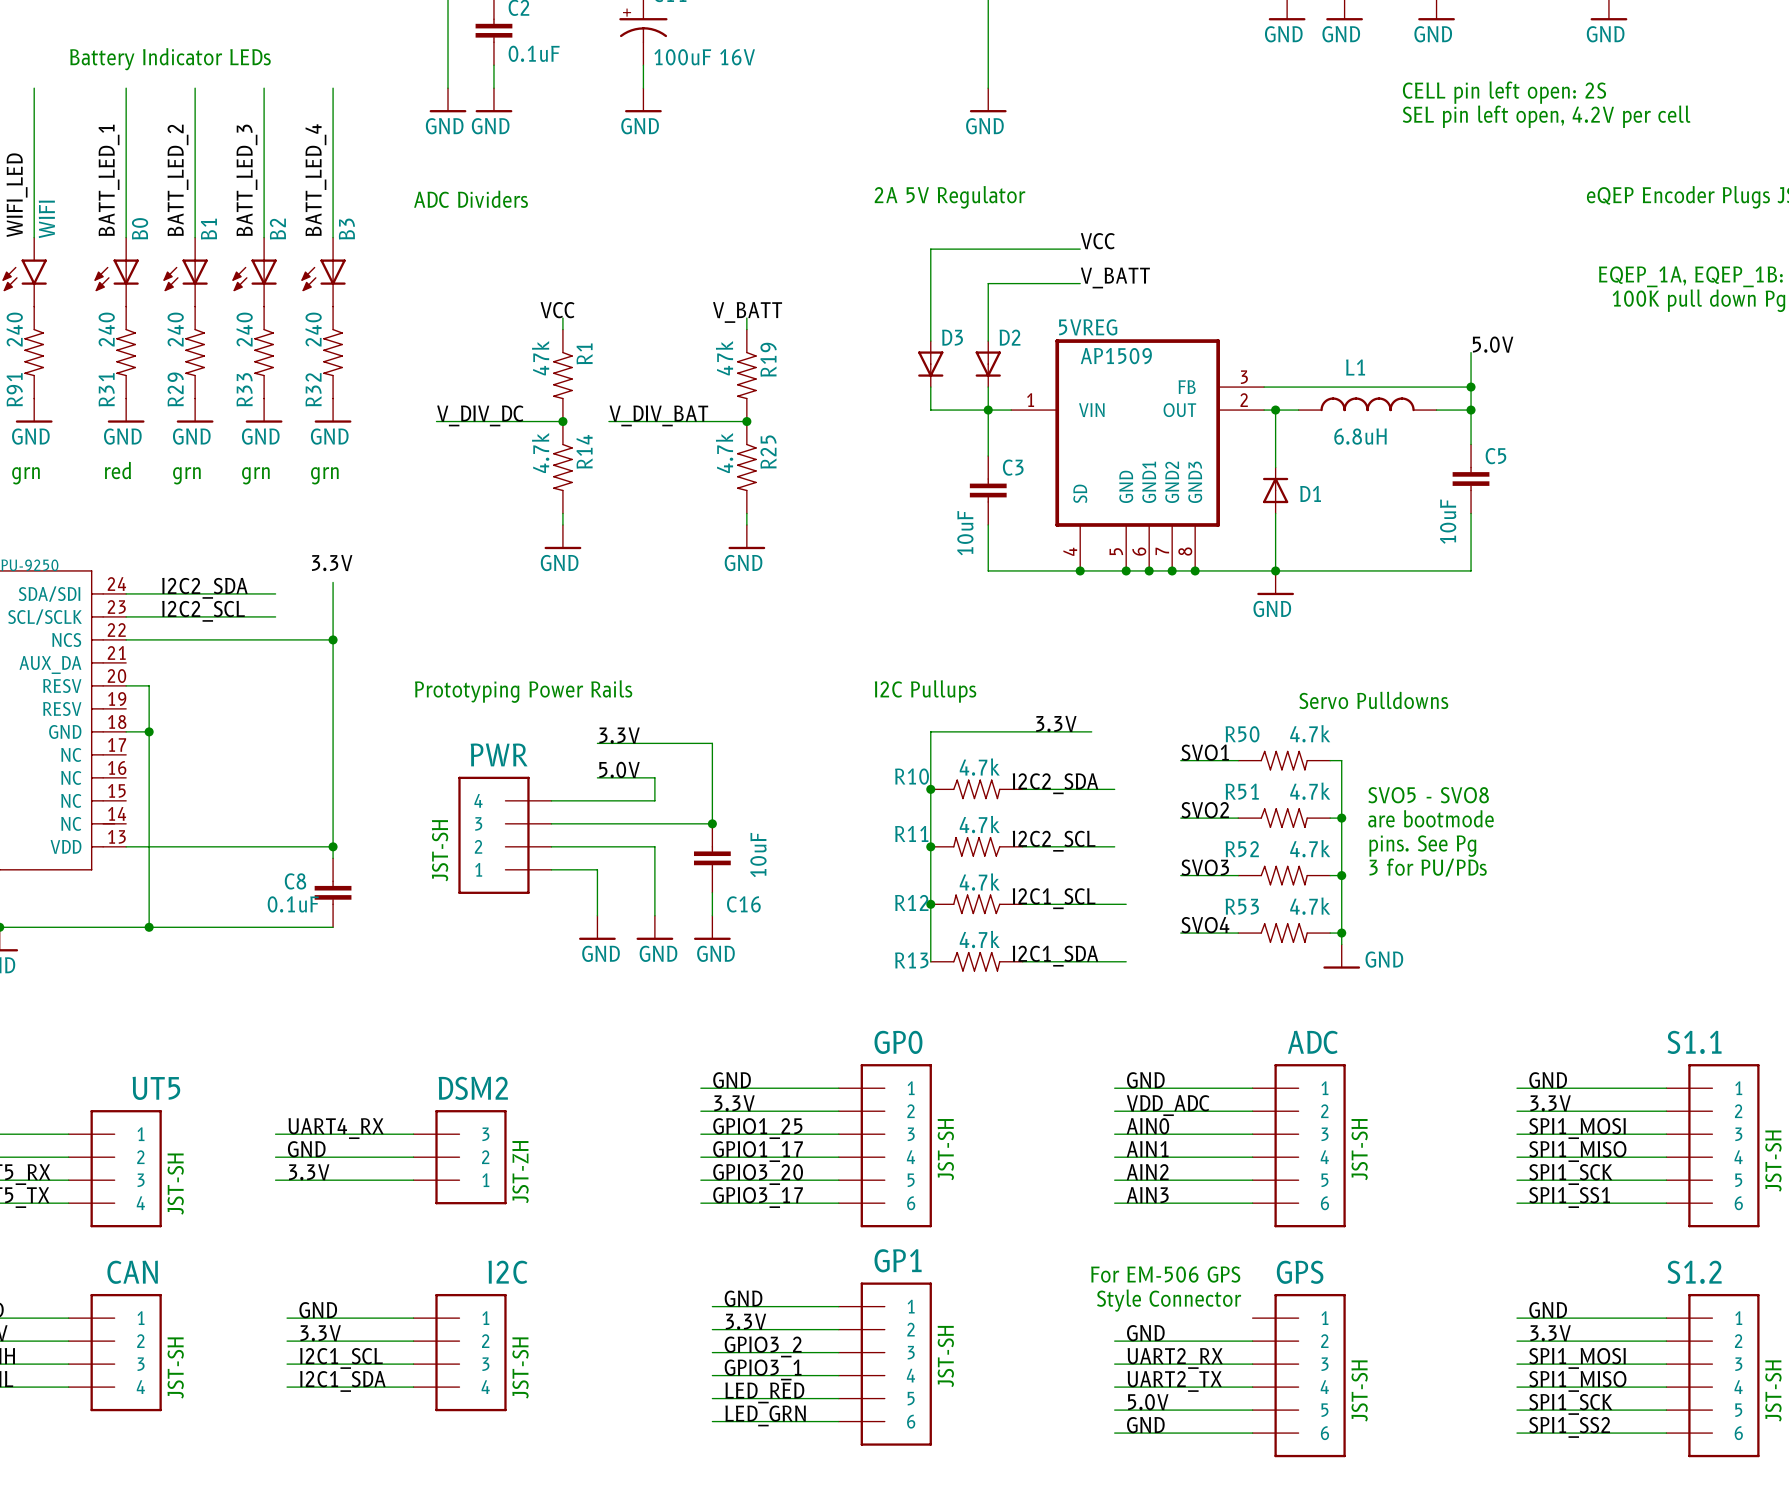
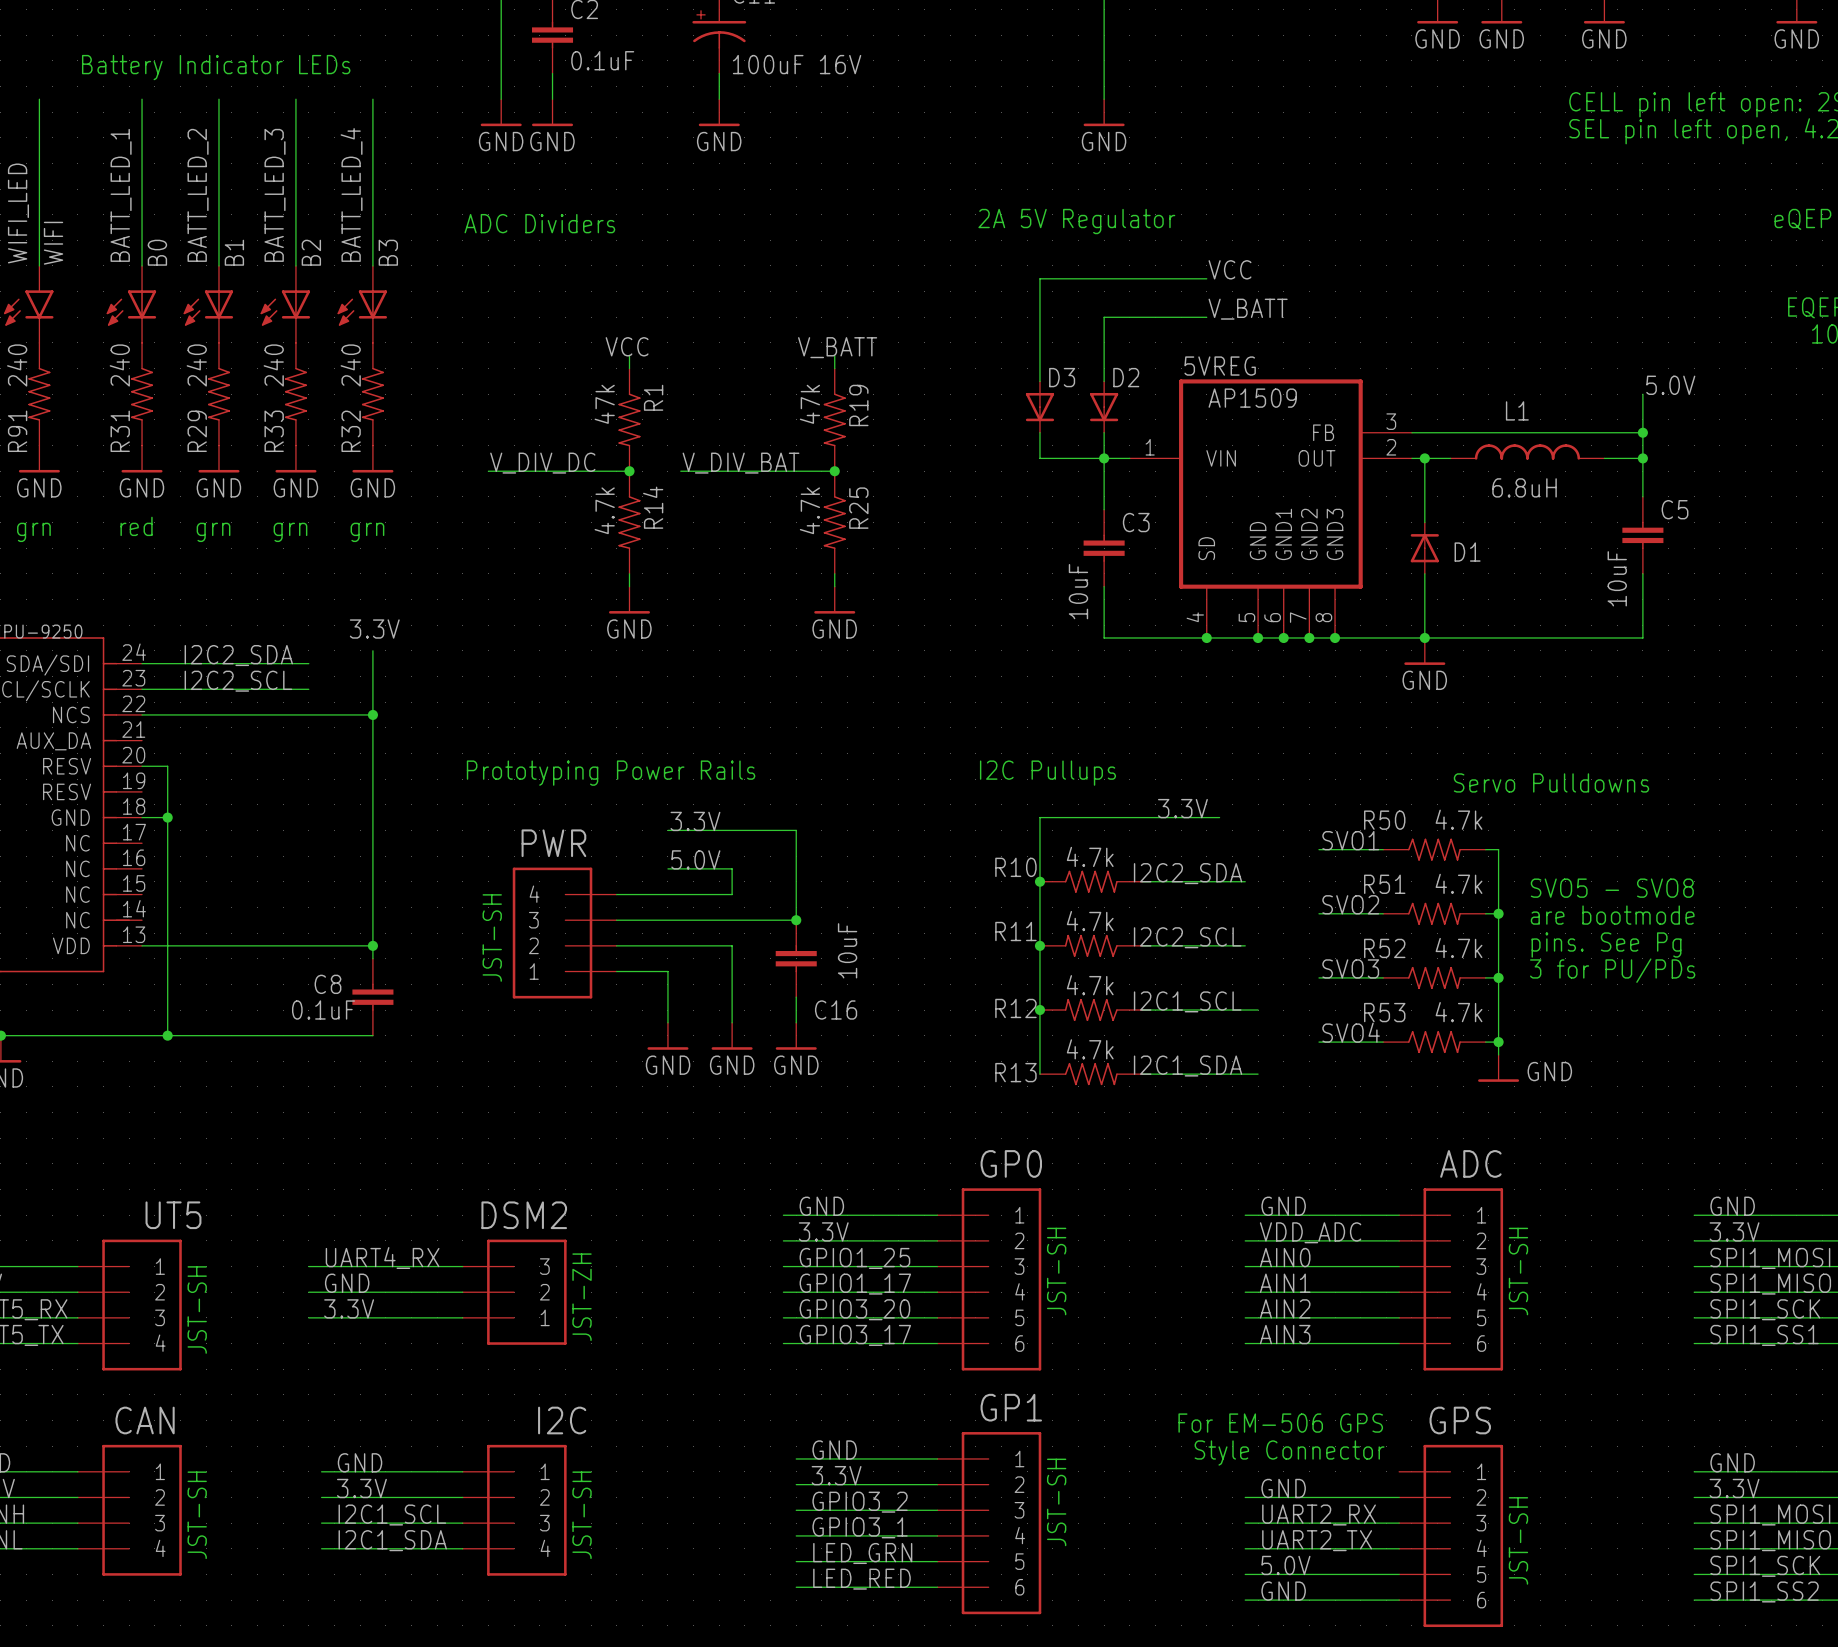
label: LED_RED (764, 1392) -> LED_GRN (862, 1553)
label: LED_GRN (765, 1415) -> LED_RED (861, 1579)

